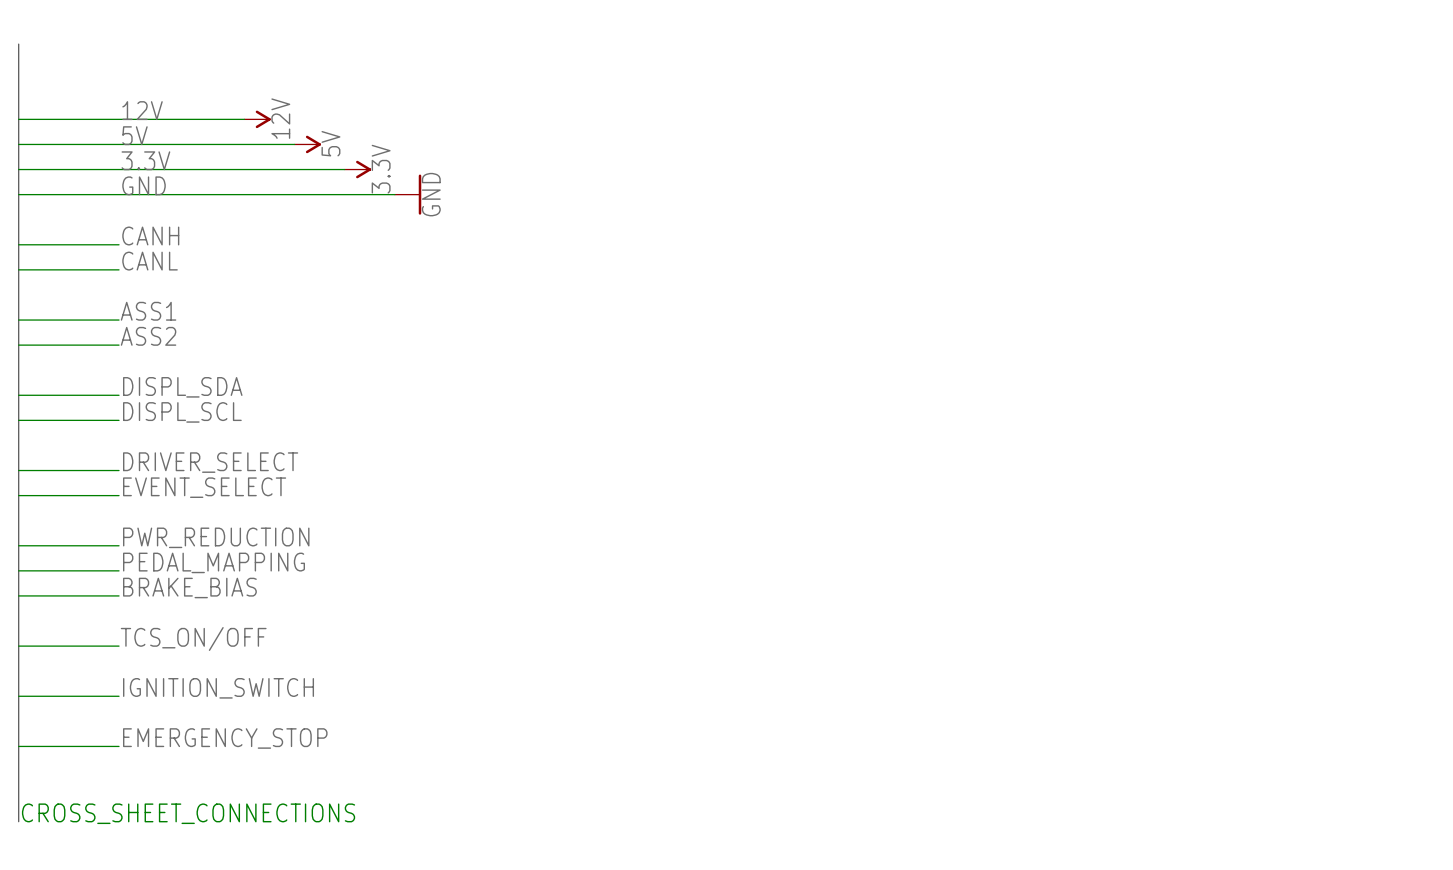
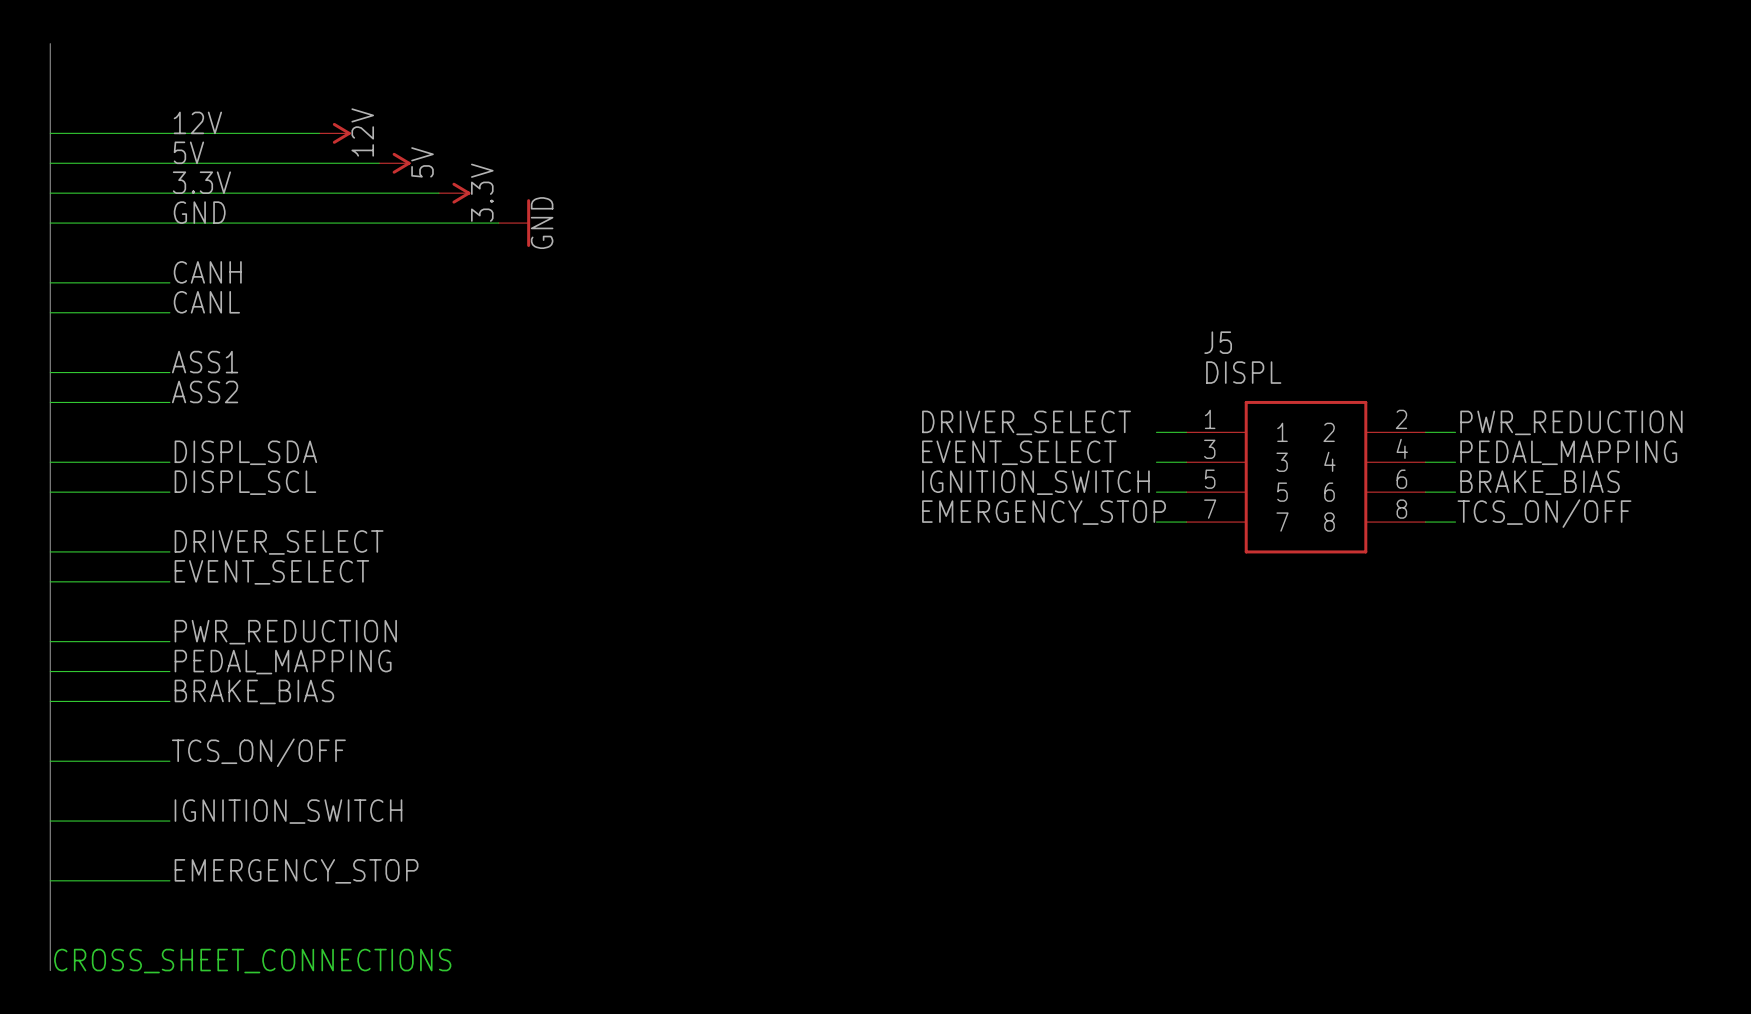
label: none -> DRIVER_SELECT (1026, 422)
label: none -> PWR_REDUCTION (1571, 422)
wire: none -> (1156, 432) (1186, 432)
wire: none -> (1425, 432) (1455, 432)
label: none -> EVENT_SELECT (1019, 452)
label: none -> PEDAL_MAPPING (1568, 452)
wire: none -> (1156, 462) (1186, 462)
wire: none -> (1425, 462) (1455, 462)
J5: none -> DISPL (1306, 477)
label: none -> IGNITION_SWITCH (1035, 482)
label: none -> BRAKE_BIAS (1540, 482)
wire: none -> (1156, 492) (1186, 492)
wire: none -> (1425, 492) (1455, 492)
label: none -> EMERGENCY_STOP (1044, 512)
label: none -> TCS_ON/OFF (1544, 513)
wire: none -> (1156, 522) (1186, 522)
wire: none -> (1425, 522) (1455, 522)

